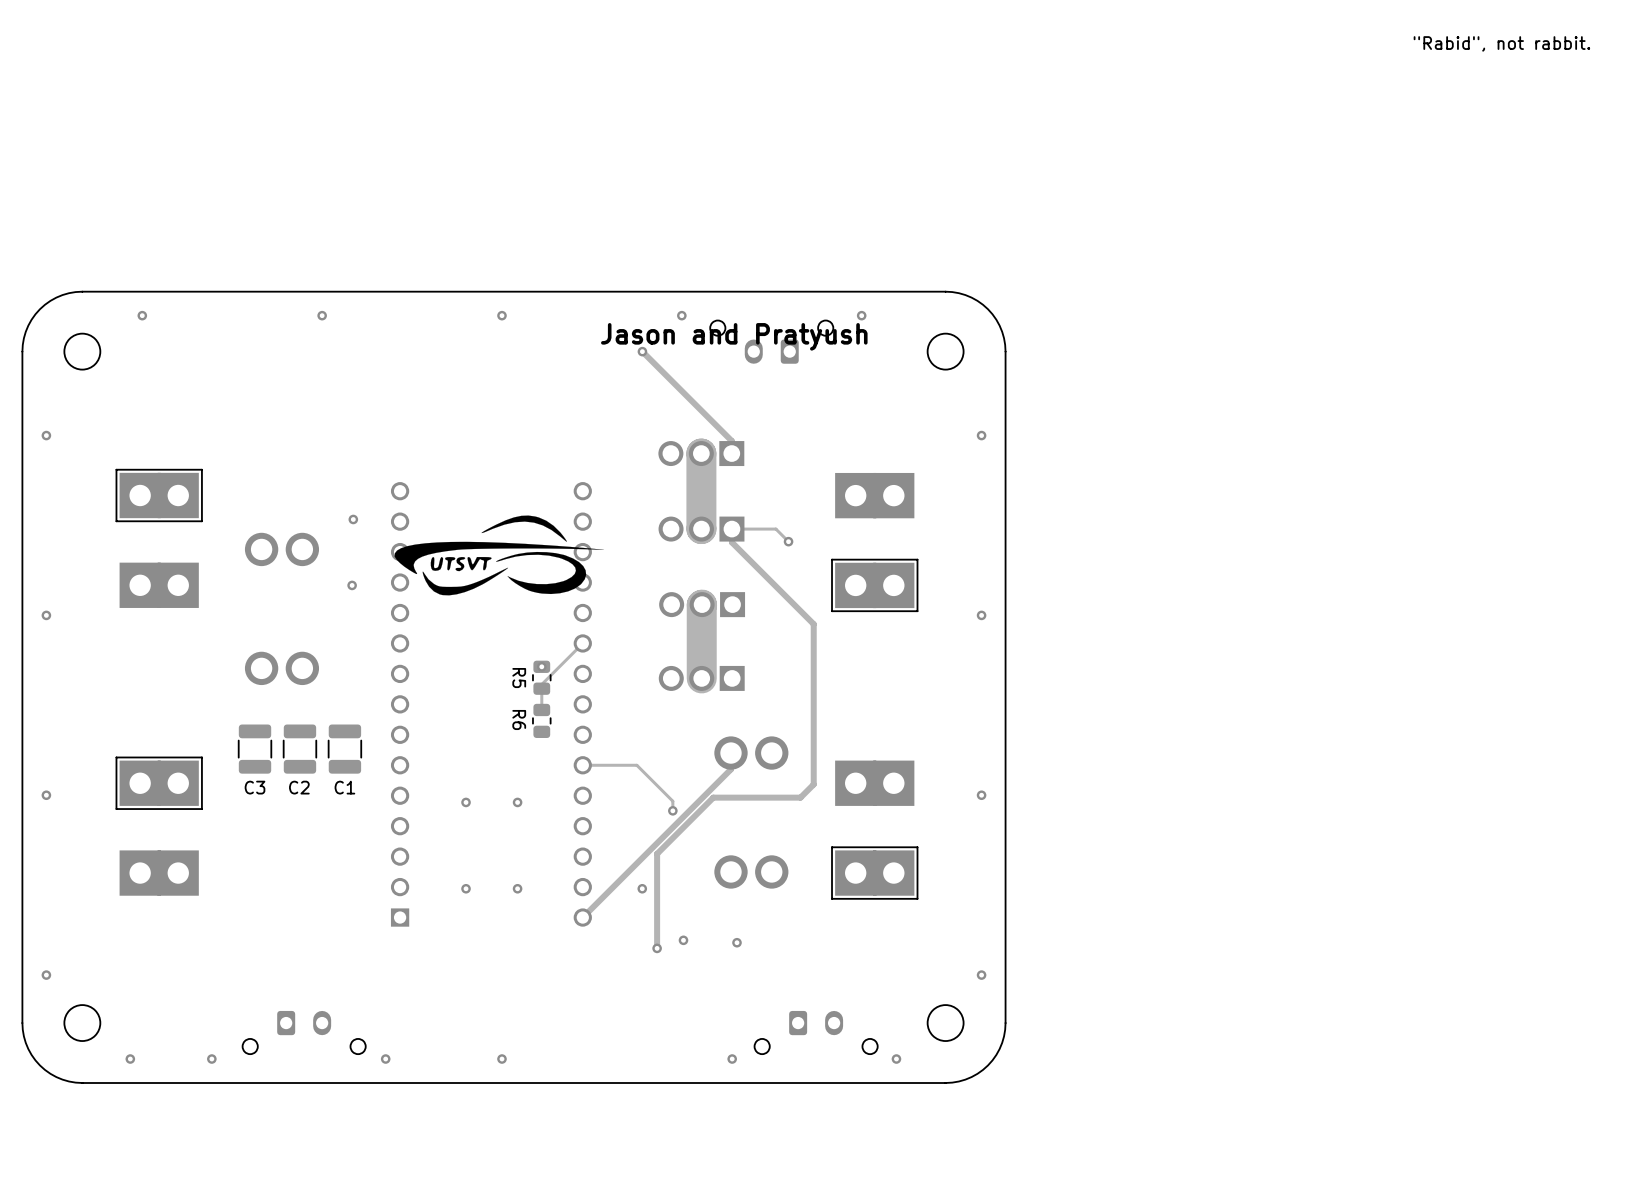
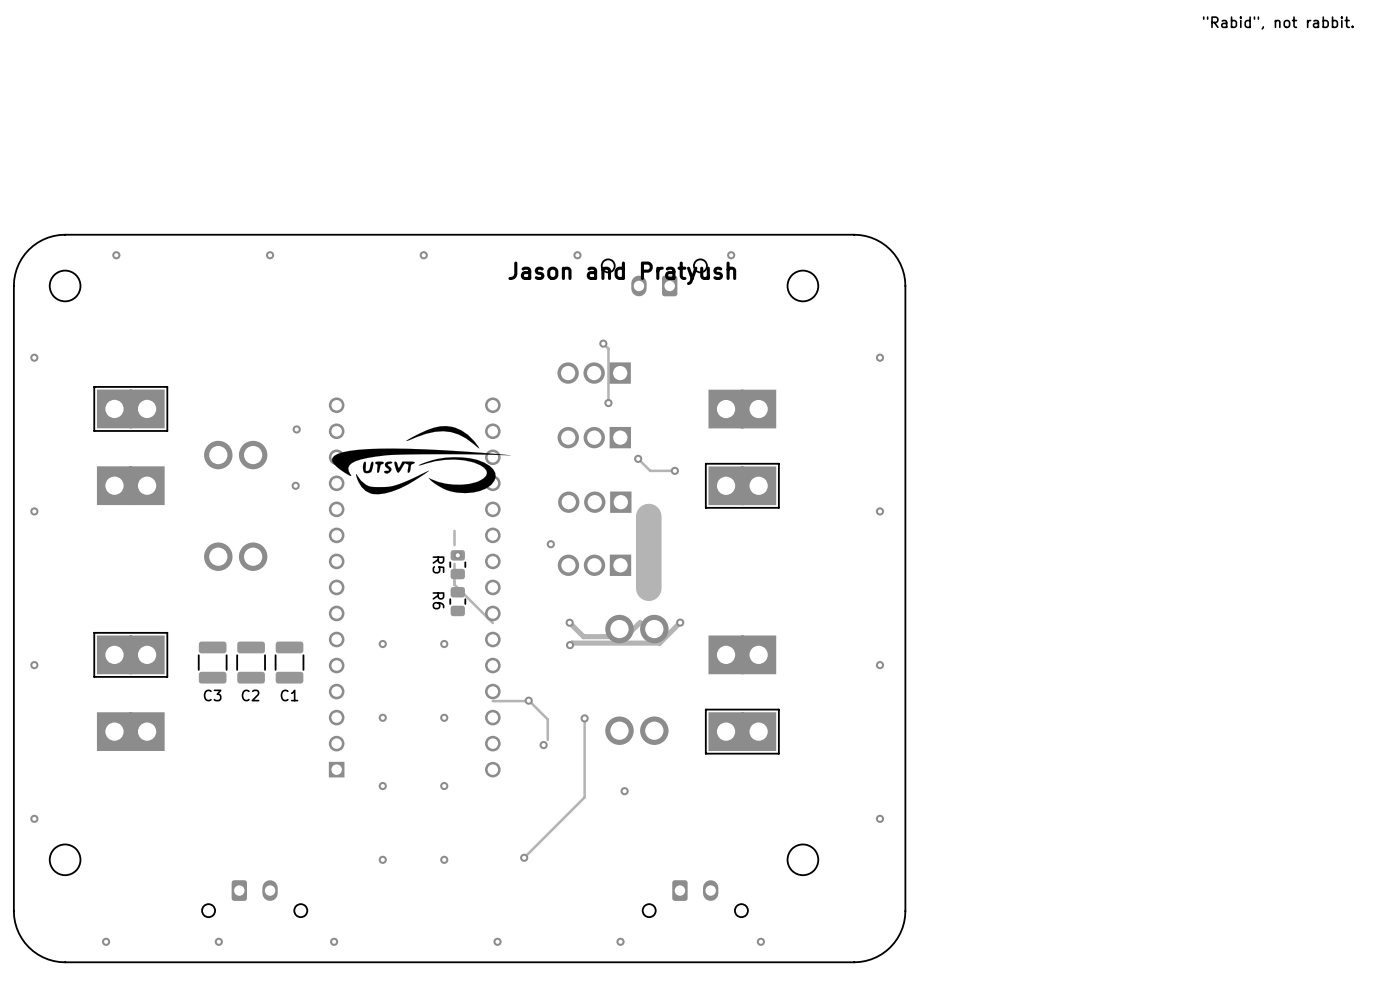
board edge: (945, 291) (965, 295) (977, 300) (988, 309) (999, 325) (1004, 338) (1005, 351) (1005, 1023) (1004, 1036) (999, 1049) (992, 1060) (982, 1069) (965, 1079) (945, 1082) (82, 1082) (62, 1079) (50, 1073) (39, 1065) (31, 1054) (25, 1042) (22, 1023) -> (802, 234) (859, 235) (876, 239) (890, 249) (897, 258) (905, 280) (905, 911) (900, 933) (886, 951) (871, 959) (854, 962) (59, 961) (42, 957) (33, 951) (18, 933) (14, 916) (13, 859)
track: (642, 351) (731, 441) (731, 453) -> none
via: (642, 351) -> none
track: none -> (603, 343) (608, 348) (608, 403)
via: none -> (603, 343)
via position: (981, 435) -> (879, 357)
track: (701, 453) (701, 528) -> none
via: none -> (608, 403)
track: (731, 528) (731, 542) (813, 624) (813, 784) (800, 797) (713, 797) (657, 853) (657, 948) -> none
track: (731, 529) (775, 529) (788, 541) -> none
via: (788, 541) -> none
track: none -> (638, 458) (650, 470) (674, 470)
via: none -> (638, 458)
via: none -> (674, 470)
track: (702, 604) (701, 678) -> none
via position: (981, 615) -> (879, 511)
track: none -> (648, 516) (648, 588)
track: none -> (454, 530) (454, 545)
track: (582, 643) (541, 684) (541, 709) -> none
via: none -> (550, 544)
track: none -> (454, 563) (454, 584) (492, 623)
via: none -> (569, 622)
track: none -> (640, 622) (625, 636) (583, 636) (569, 622)
track: none -> (680, 622) (659, 643) (572, 643) (570, 645)
via: none -> (680, 622)
C3 position: (255, 749) -> (212, 662)
C2 position: (299, 749) -> (251, 662)
C1 position: (344, 749) -> (289, 662)
track: (730, 753) (730, 769) (582, 917) -> none
track: (582, 765) (636, 765) (672, 801) (672, 810) -> none
via: none -> (382, 644)
via: none -> (444, 644)
via: none -> (570, 645)
via position: (981, 795) -> (879, 665)
via: (466, 802) -> none
via: (517, 802) -> none
via: (672, 810) -> none
via: none -> (528, 700)
track: none -> (492, 701) (528, 700) (547, 719) (547, 739)
via: none -> (382, 717)
via: none -> (444, 717)
track: none -> (584, 718) (584, 797) (524, 857)
via: none -> (584, 718)
via: (466, 888) -> none
via: (517, 888) -> none
via: none -> (382, 786)
via: none -> (444, 786)
via: (683, 940) -> none
via: (657, 948) -> none
via position: (981, 975) -> (879, 818)
via: none -> (524, 857)
via: none -> (382, 859)
via: none -> (444, 859)
part position: (304, 1032) -> (254, 898)
part position: (816, 1032) -> (695, 898)
via: (130, 1059) -> none
via: (211, 1059) -> none
via: (385, 1059) -> none
via: (501, 1059) -> none
via: (732, 1059) -> none
via position: (896, 1059) -> (760, 941)
via: none -> (106, 941)
via: none -> (218, 941)
via: none -> (334, 941)
via: none -> (497, 941)
via: none -> (620, 941)

